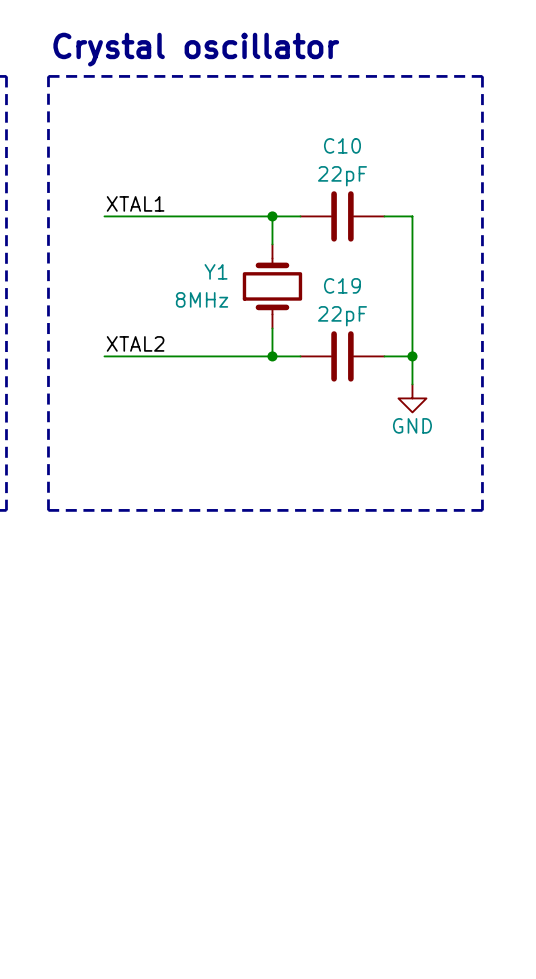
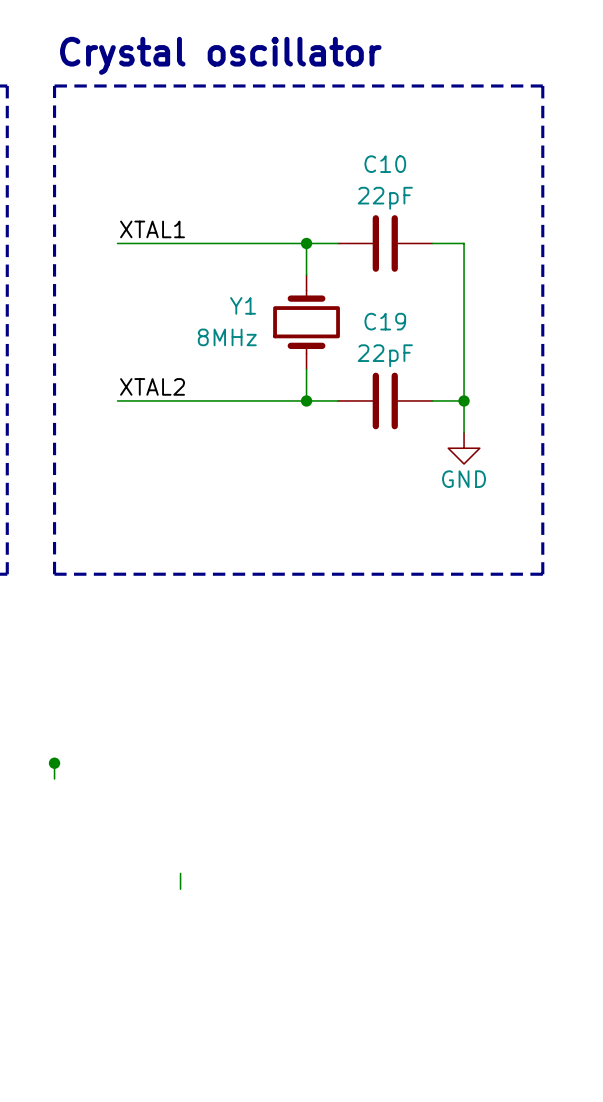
wire: none -> (54, 763) (54, 778)
junction: none -> (54, 763)
wire: none -> (180, 873) (180, 889)

